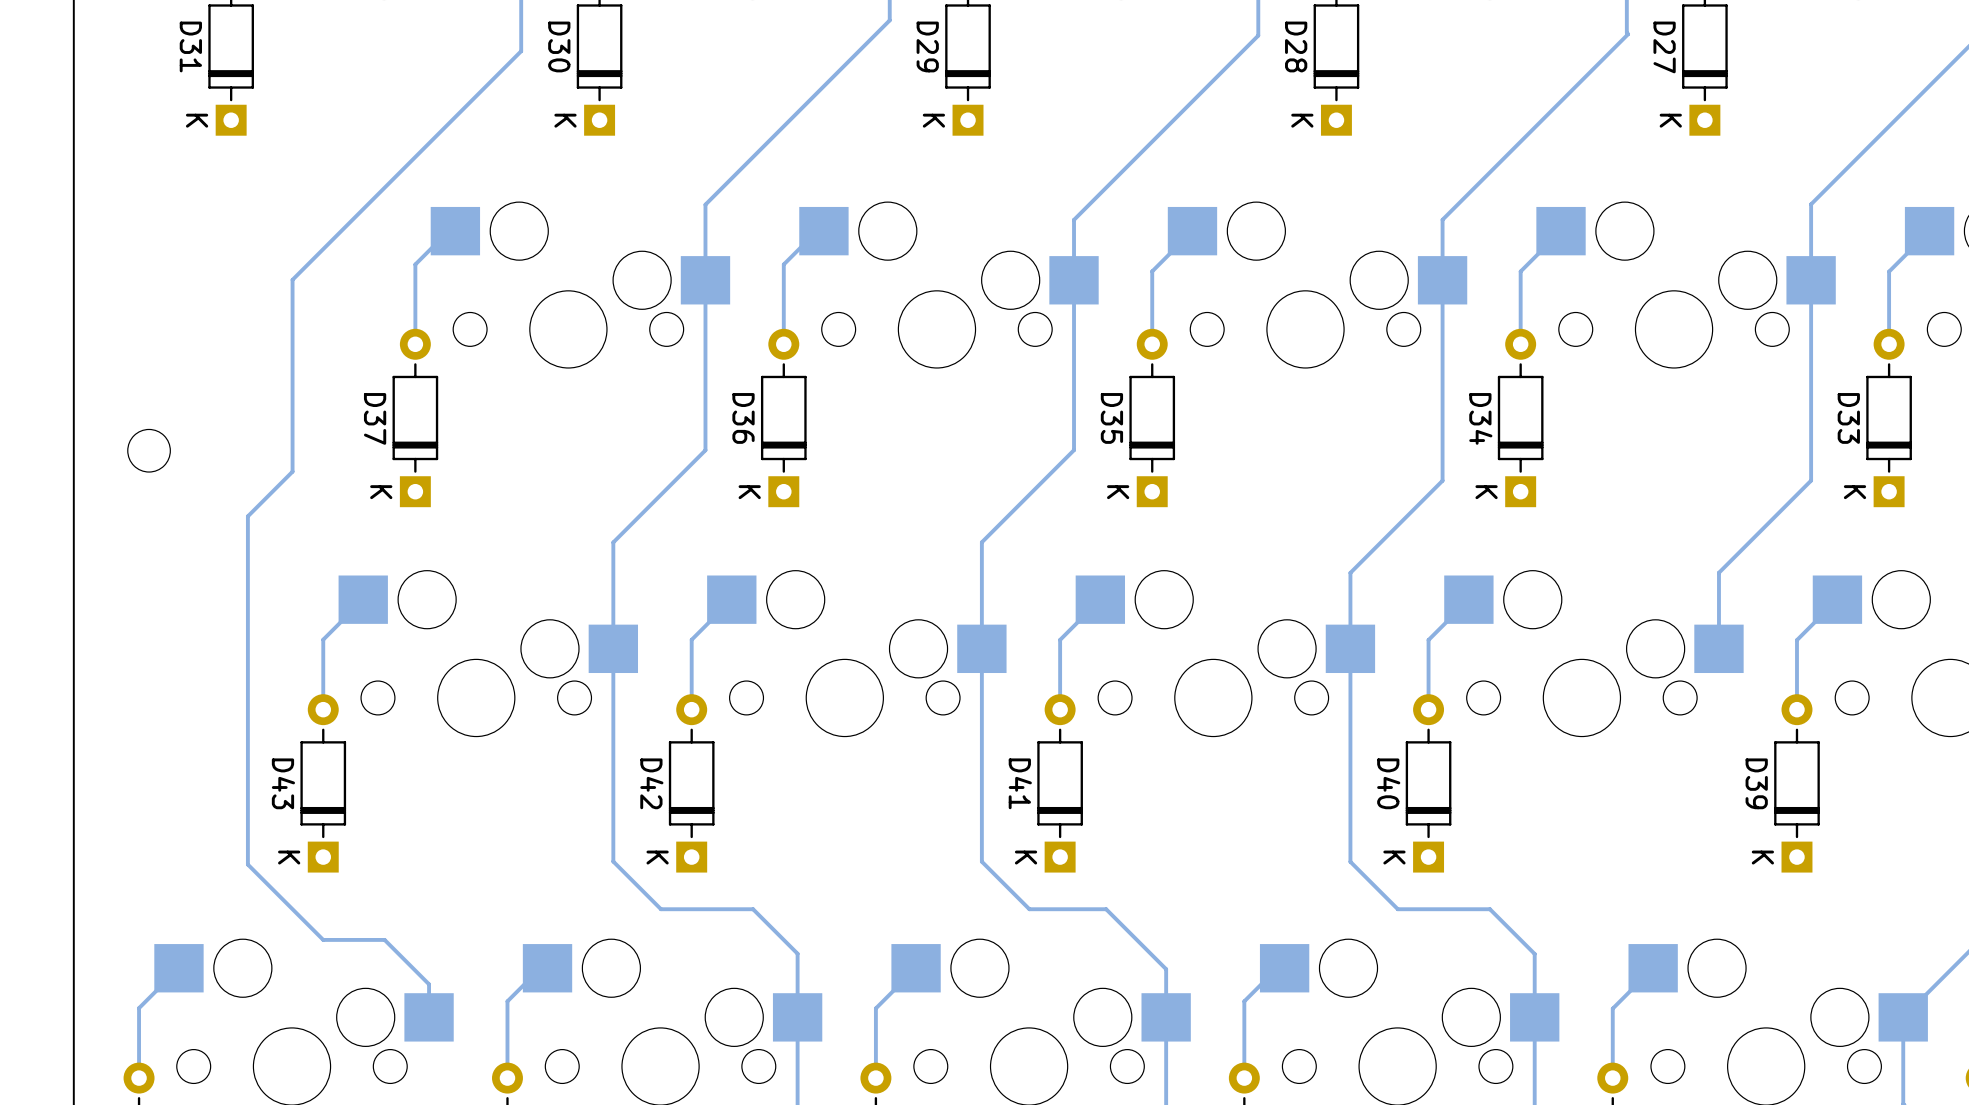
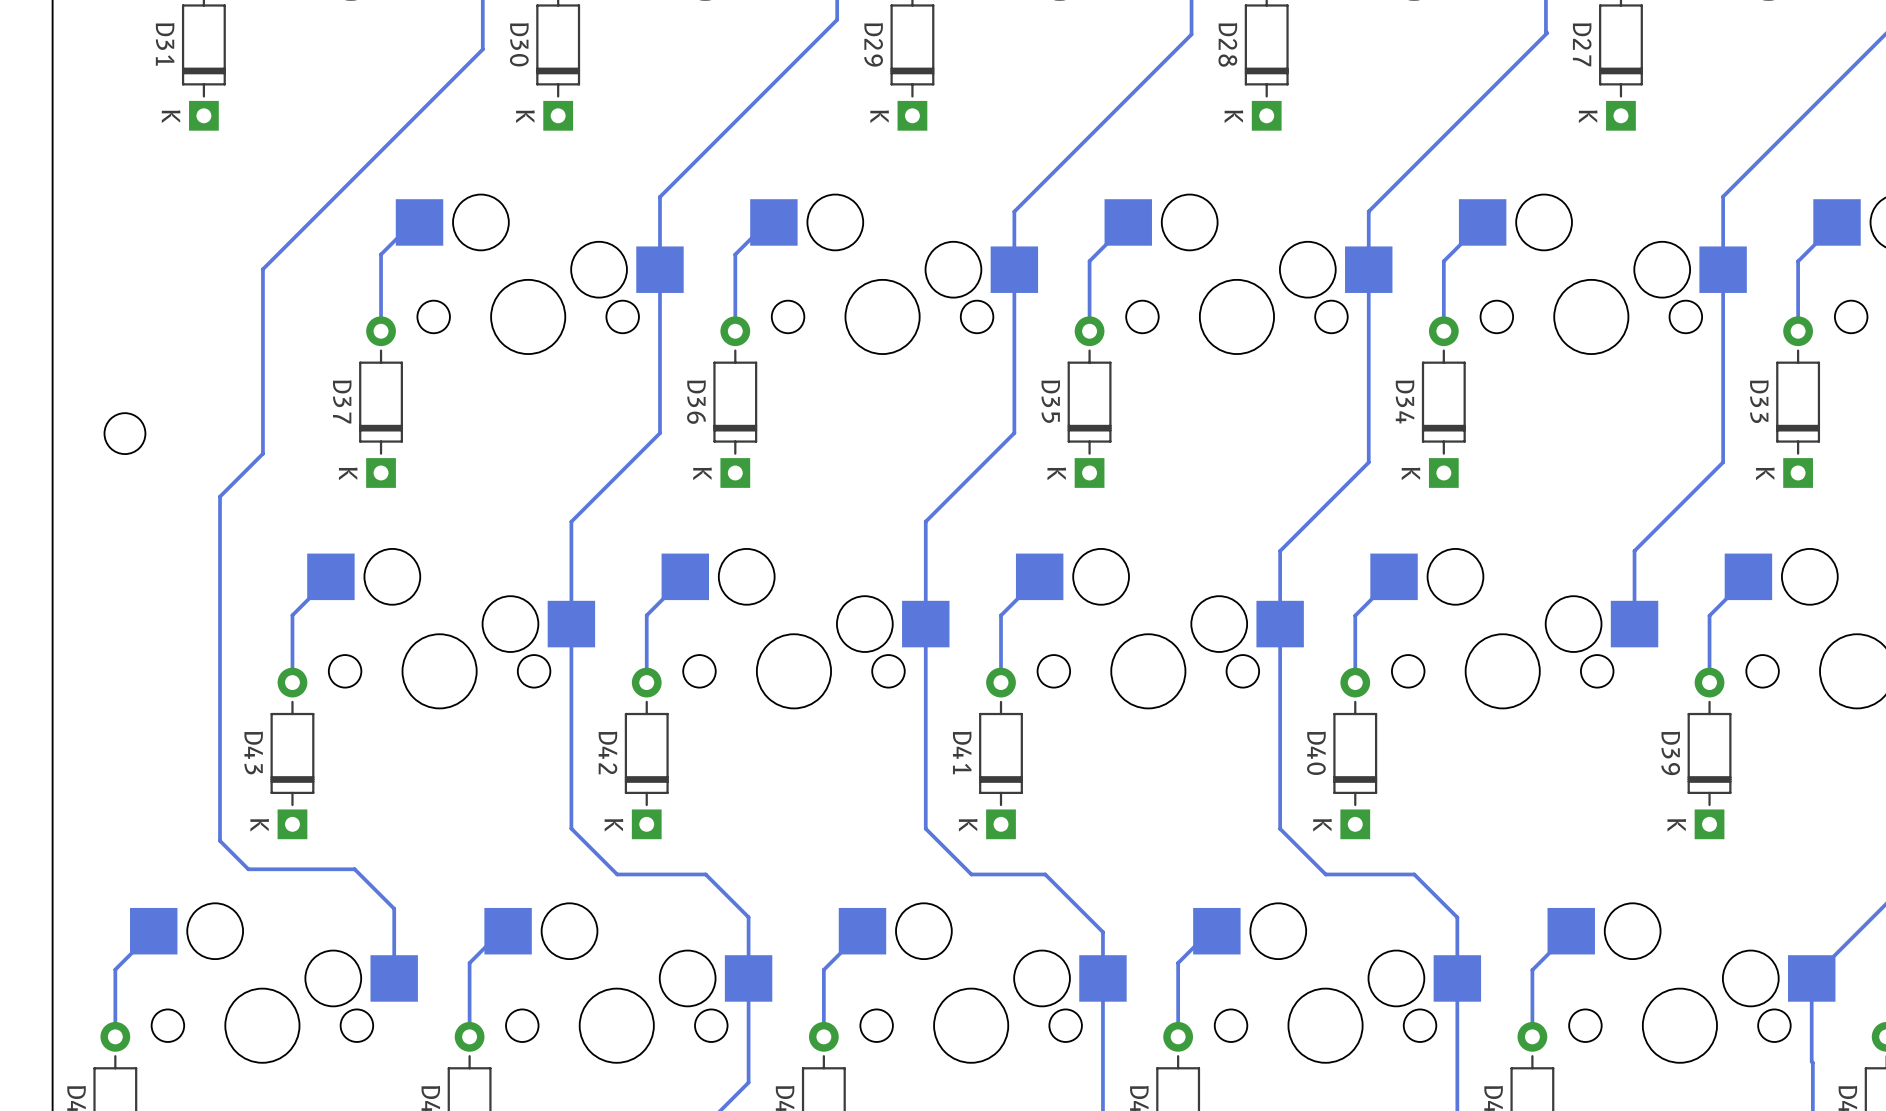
track: (247, 864) (323, 939) (384, 939) (429, 984) -> (220, 831) (220, 840) (248, 869) (354, 869) (394, 908) (394, 946)

